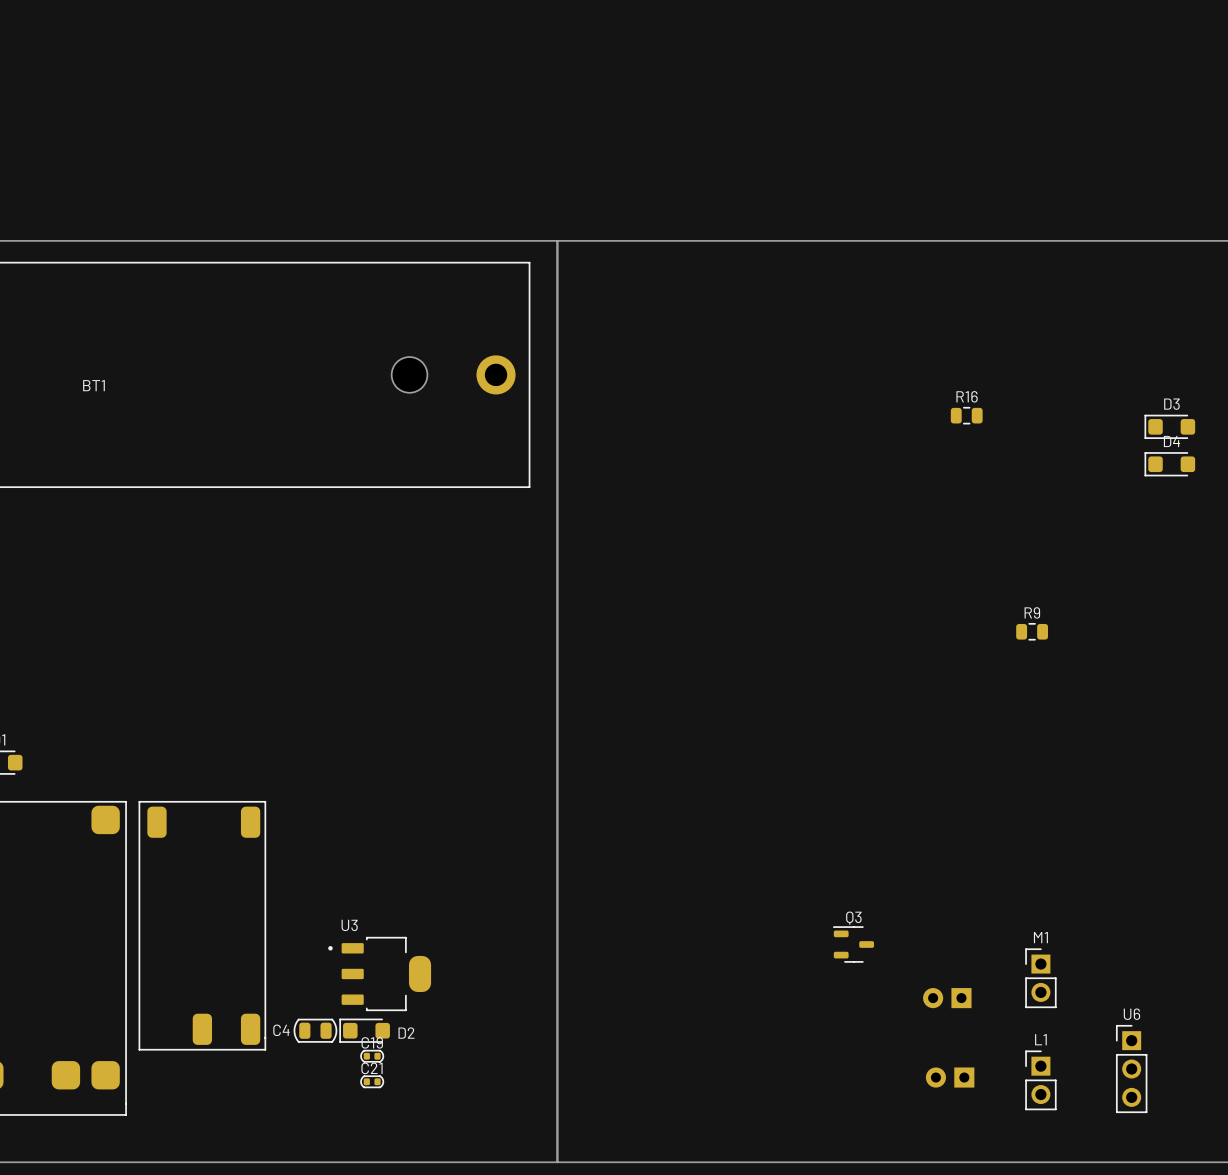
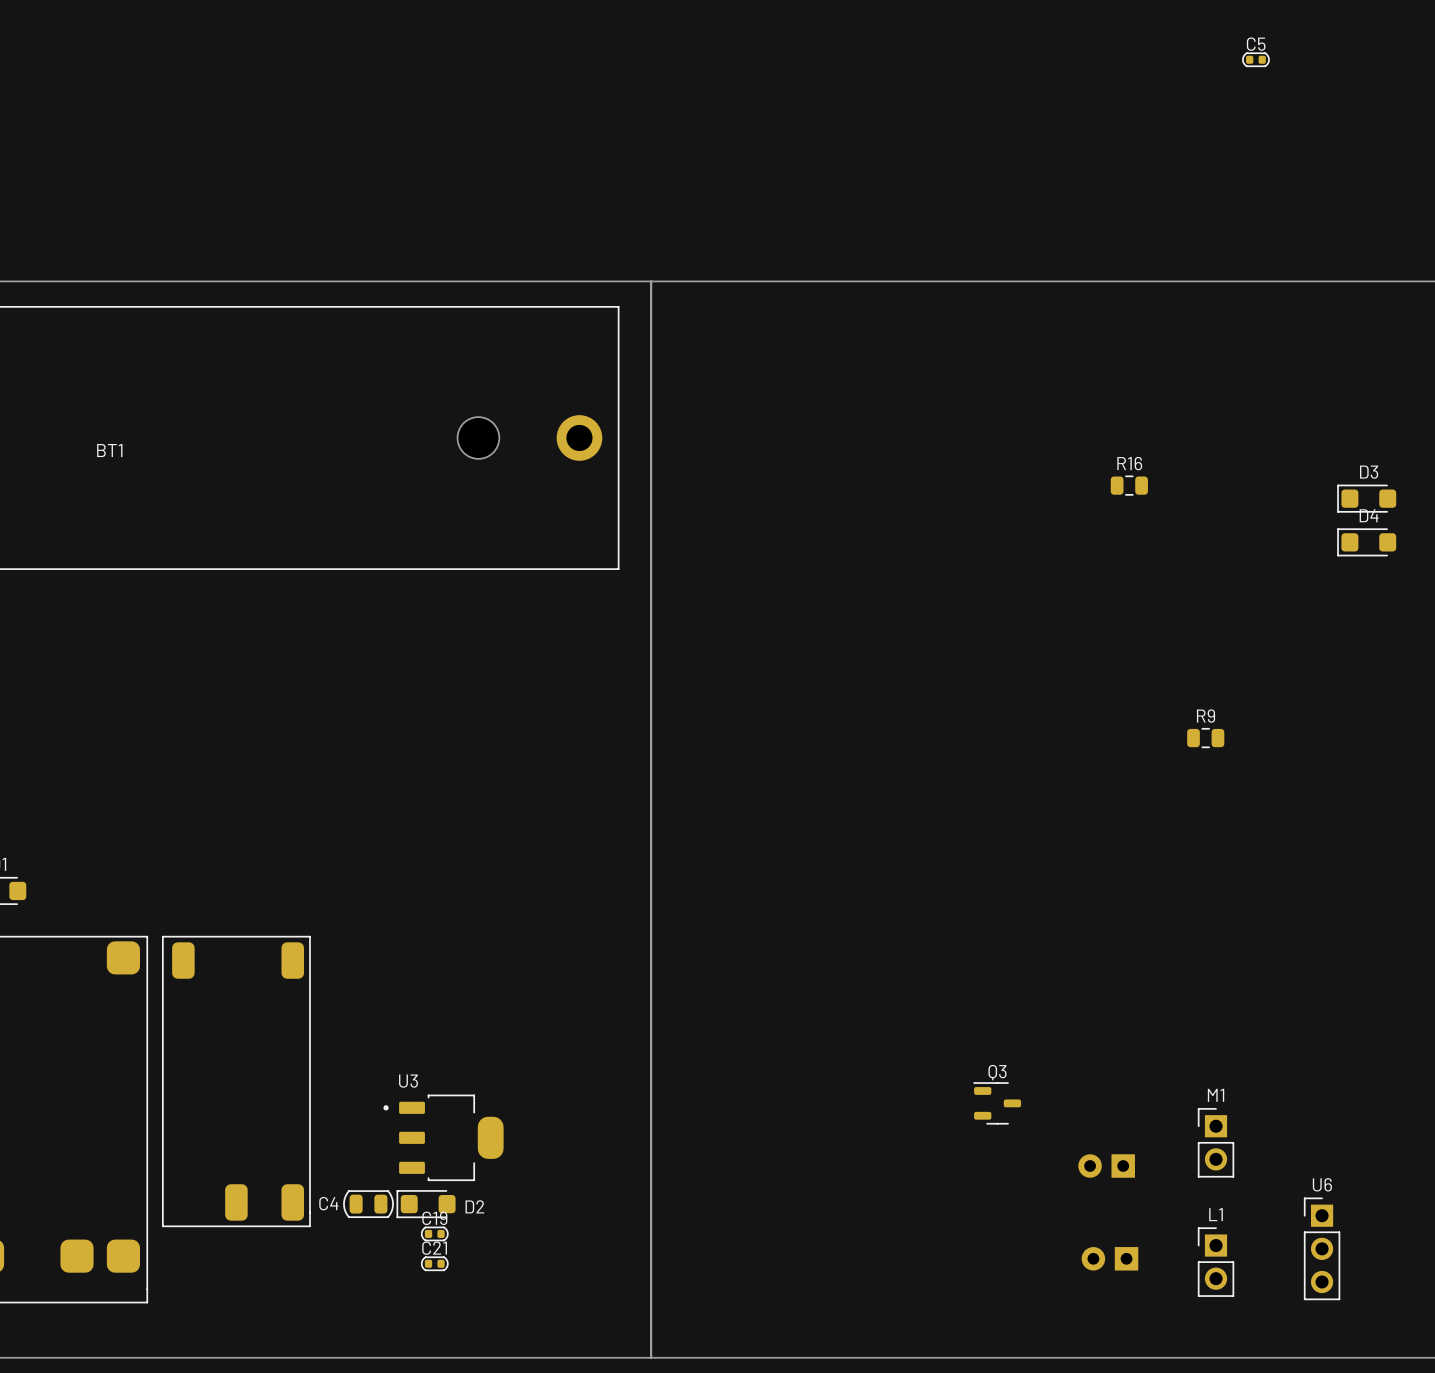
C5: none -> (1255, 59)

